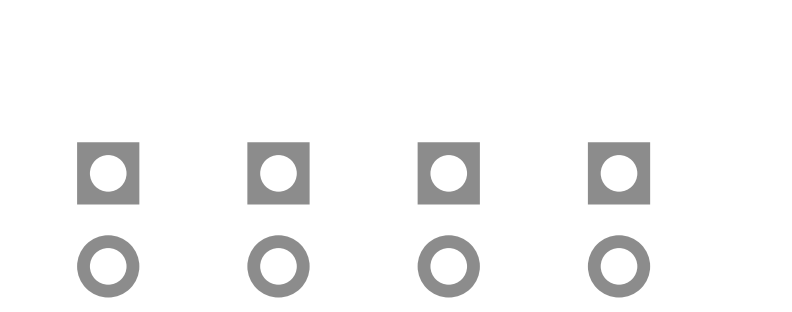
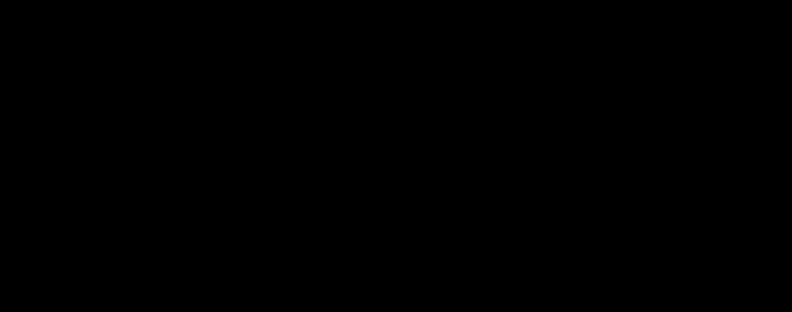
part: (108, 219) -> none
part: (278, 219) -> none
part: (448, 219) -> none
part: (619, 219) -> none

